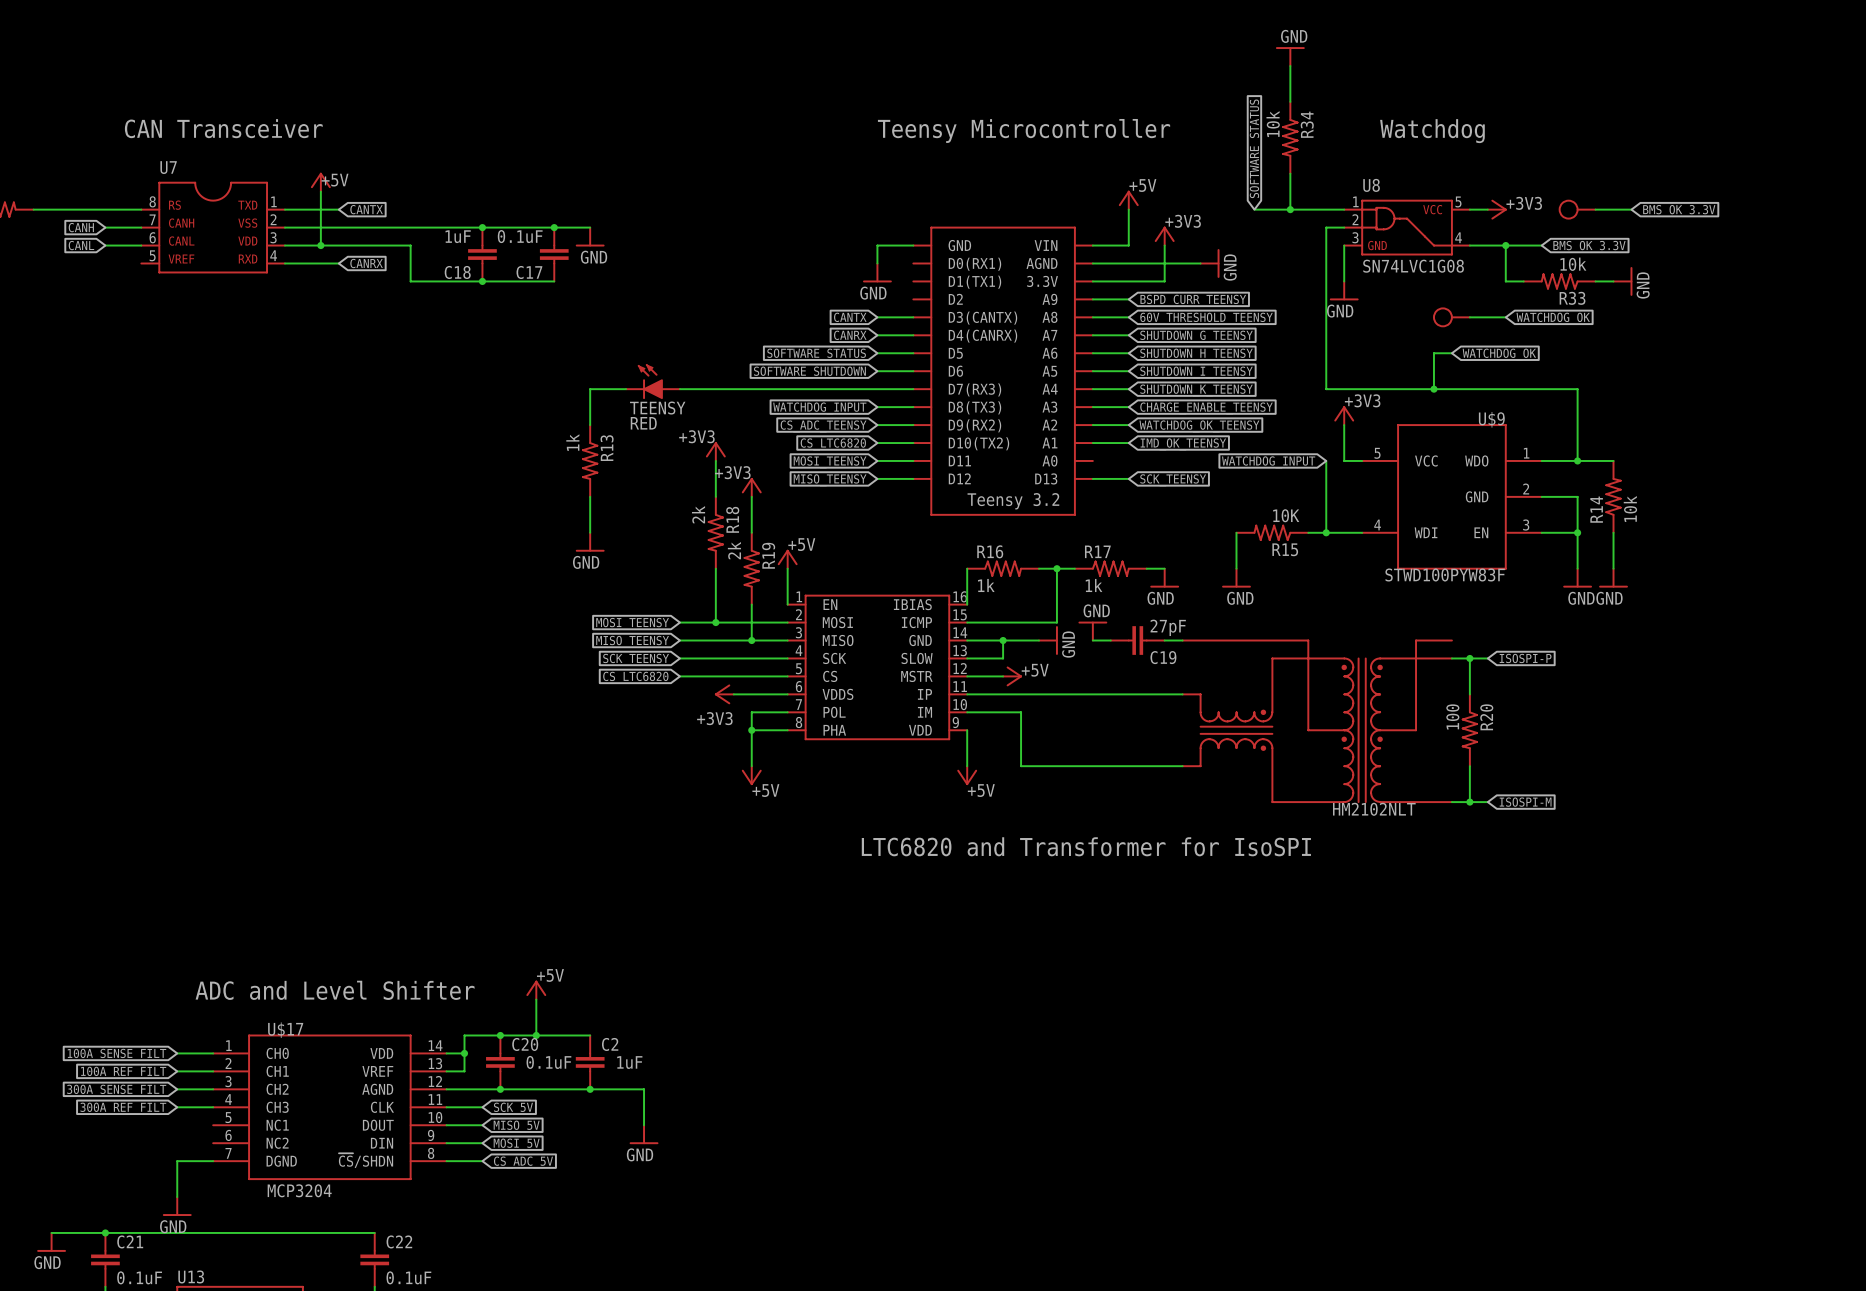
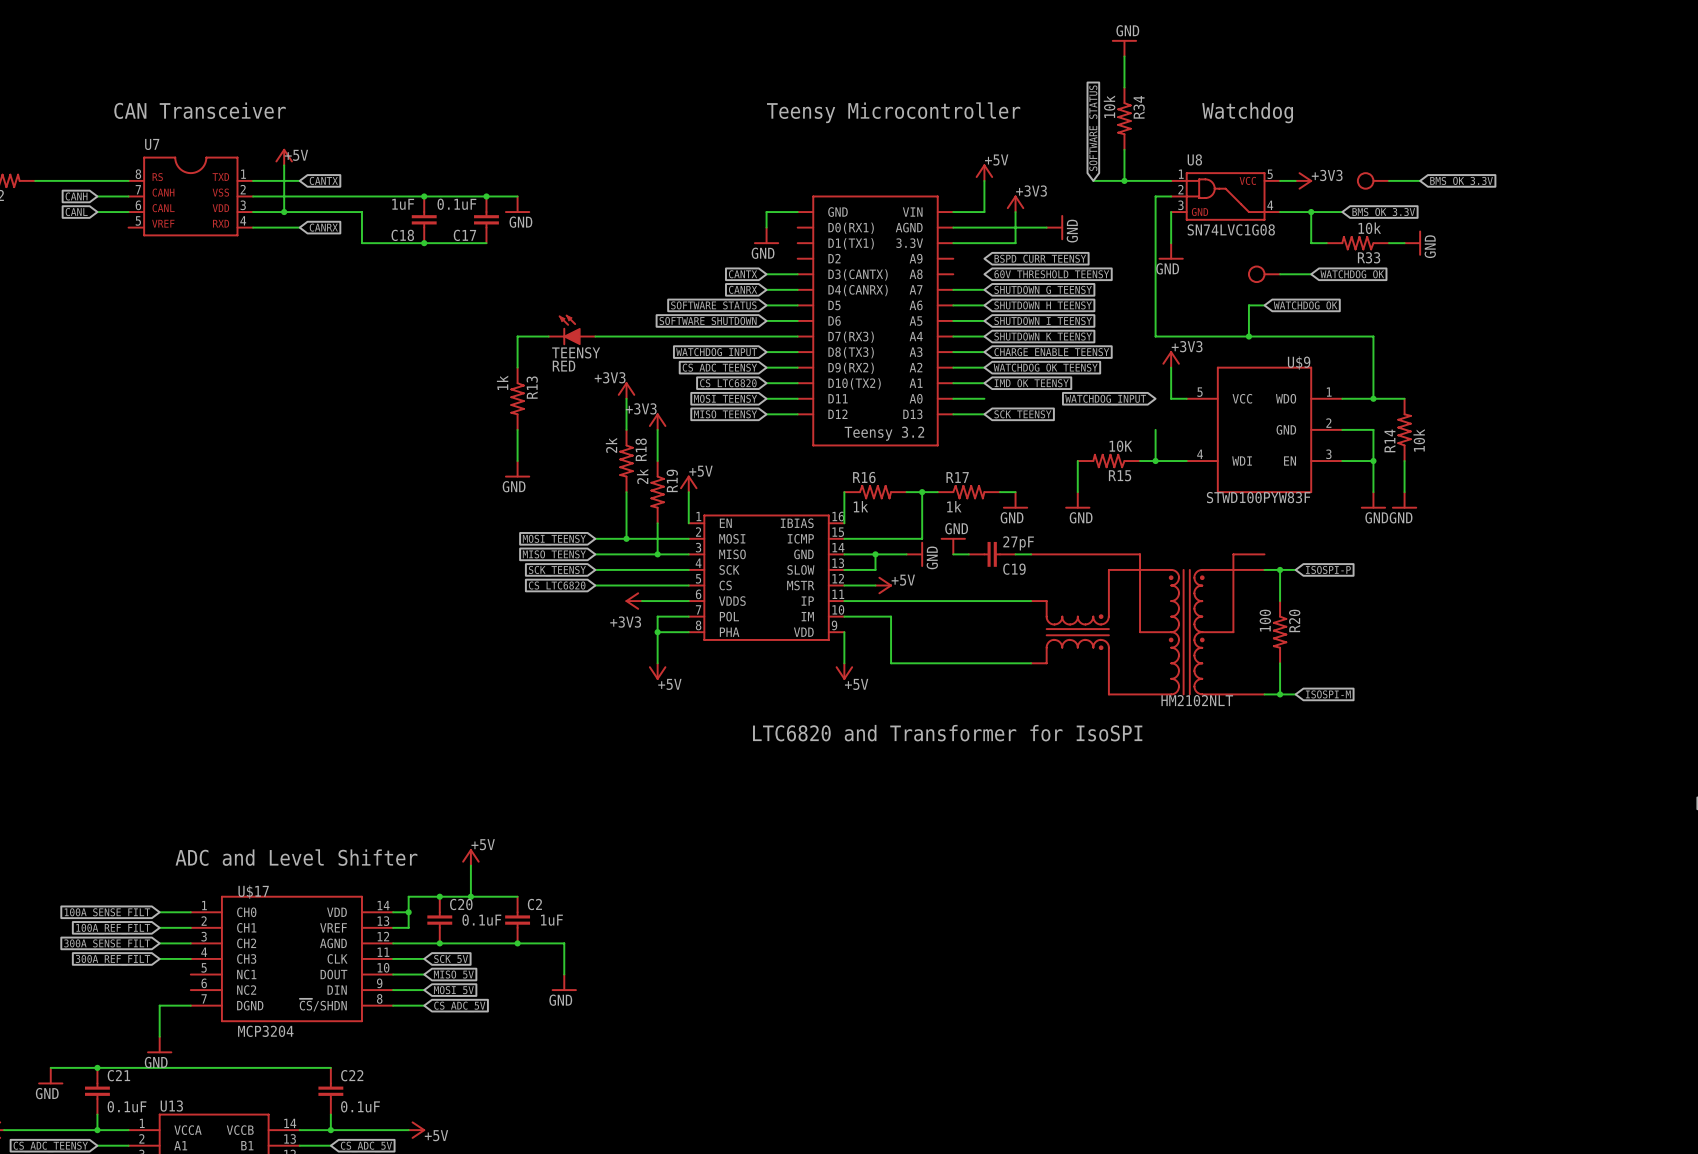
wire: (1092, 299) (1128, 299) -> none
wire: (1092, 317) (1128, 317) -> (953, 398) (984, 398)
wire: (1326, 460) (1326, 496) -> none

